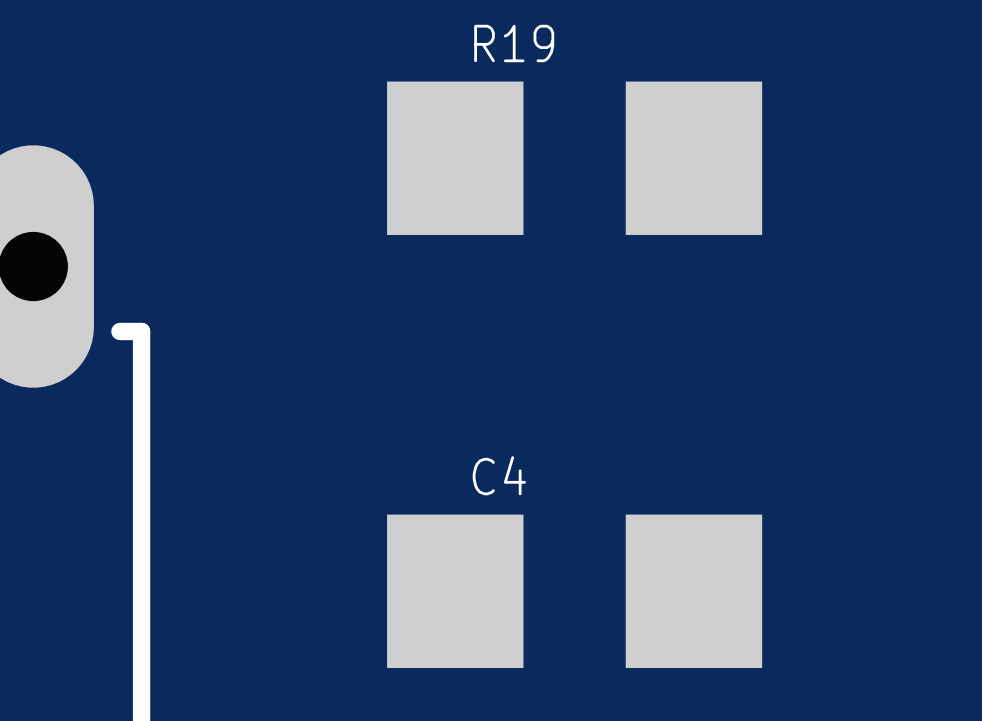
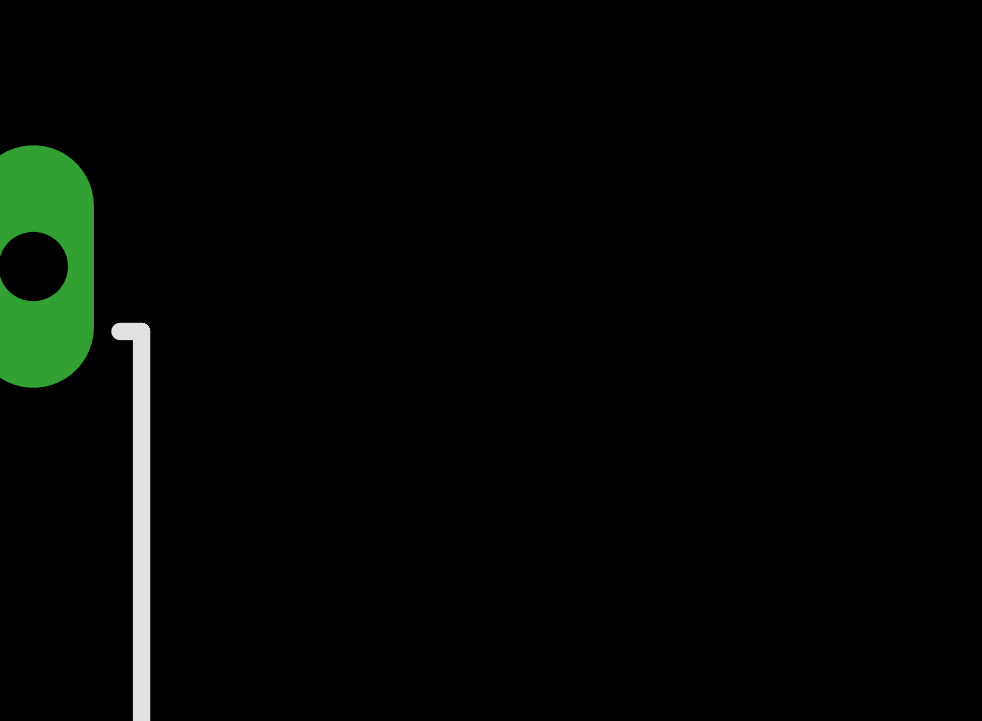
R19: (574, 158) -> none
C4: (574, 591) -> none

